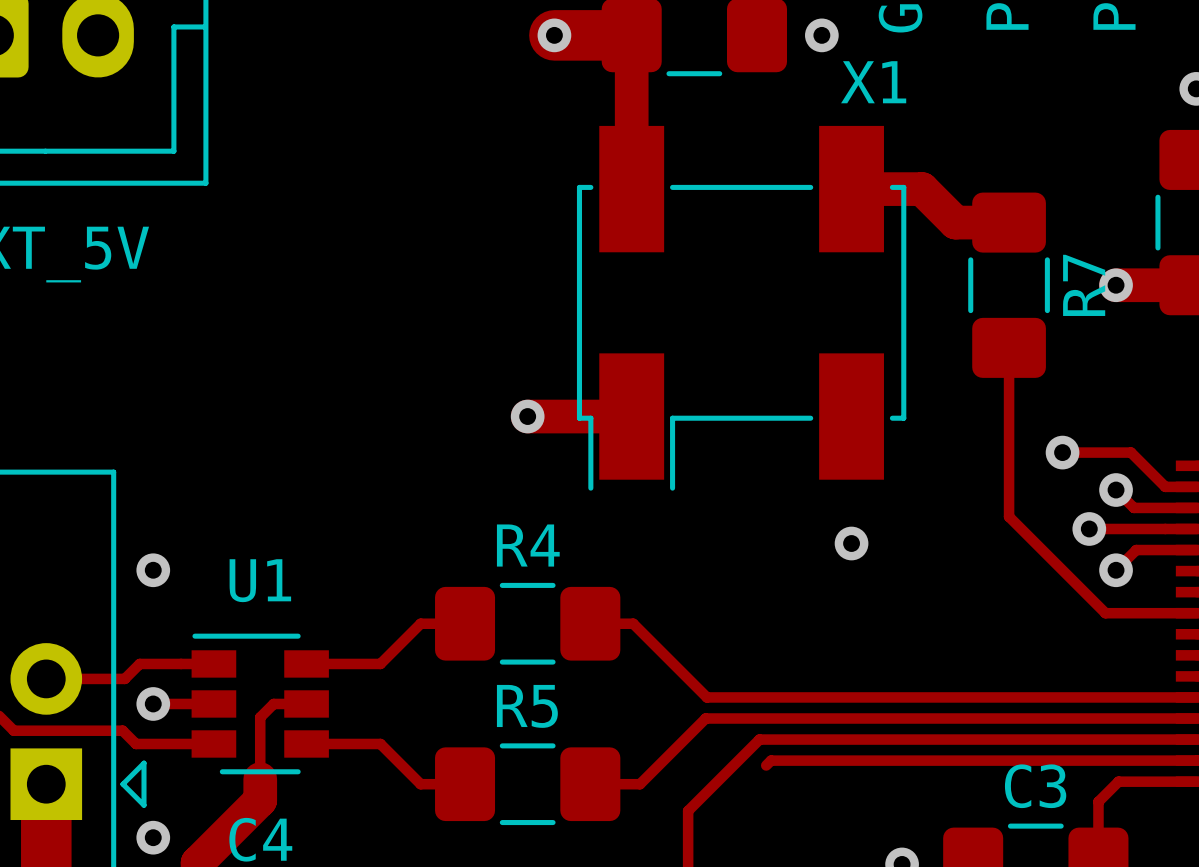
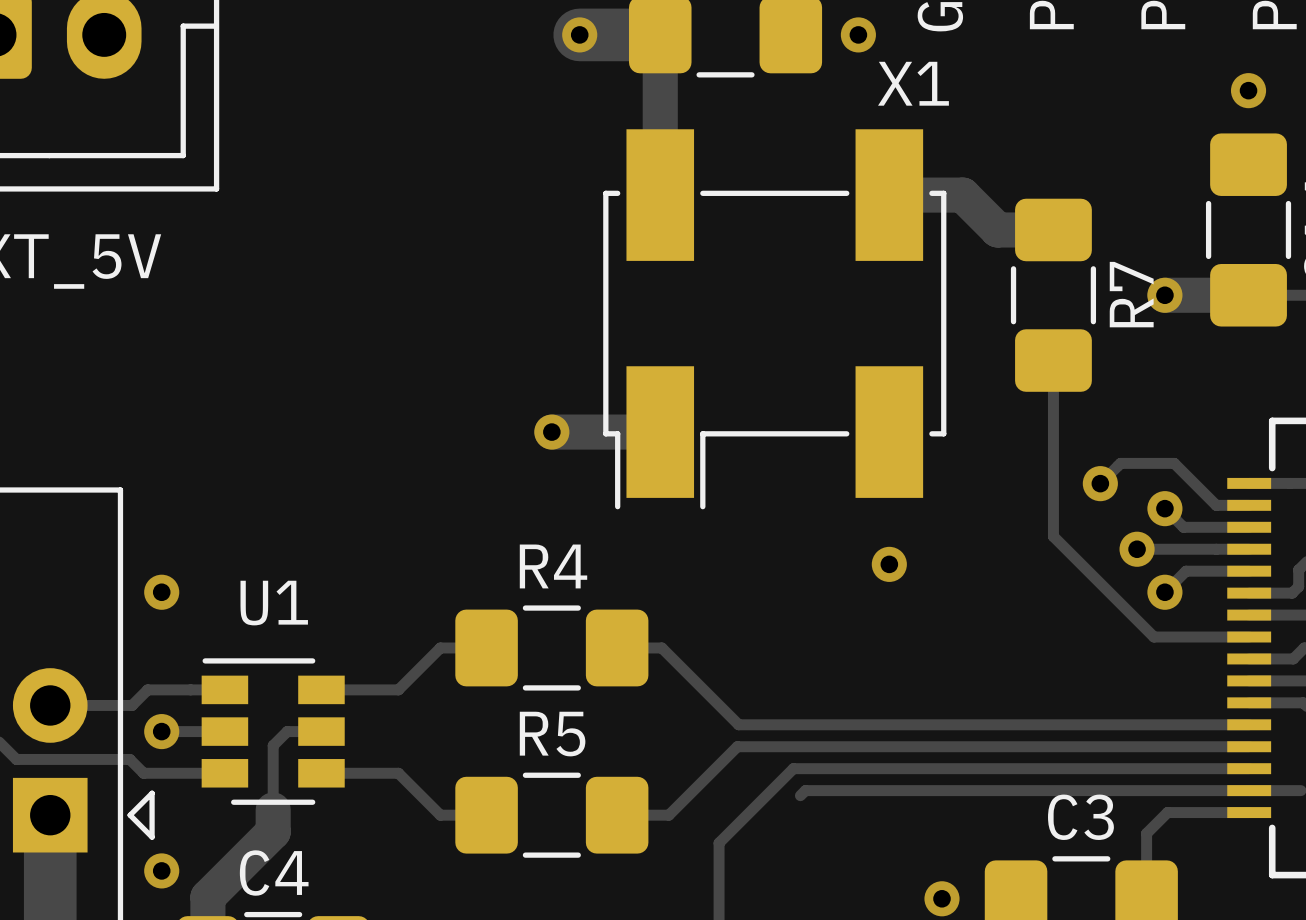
track: (1062, 452) (1131, 452) -> (1100, 483) (1120, 463) (1174, 463) (1180, 469)
via position: (1062, 452) -> (1100, 483)

